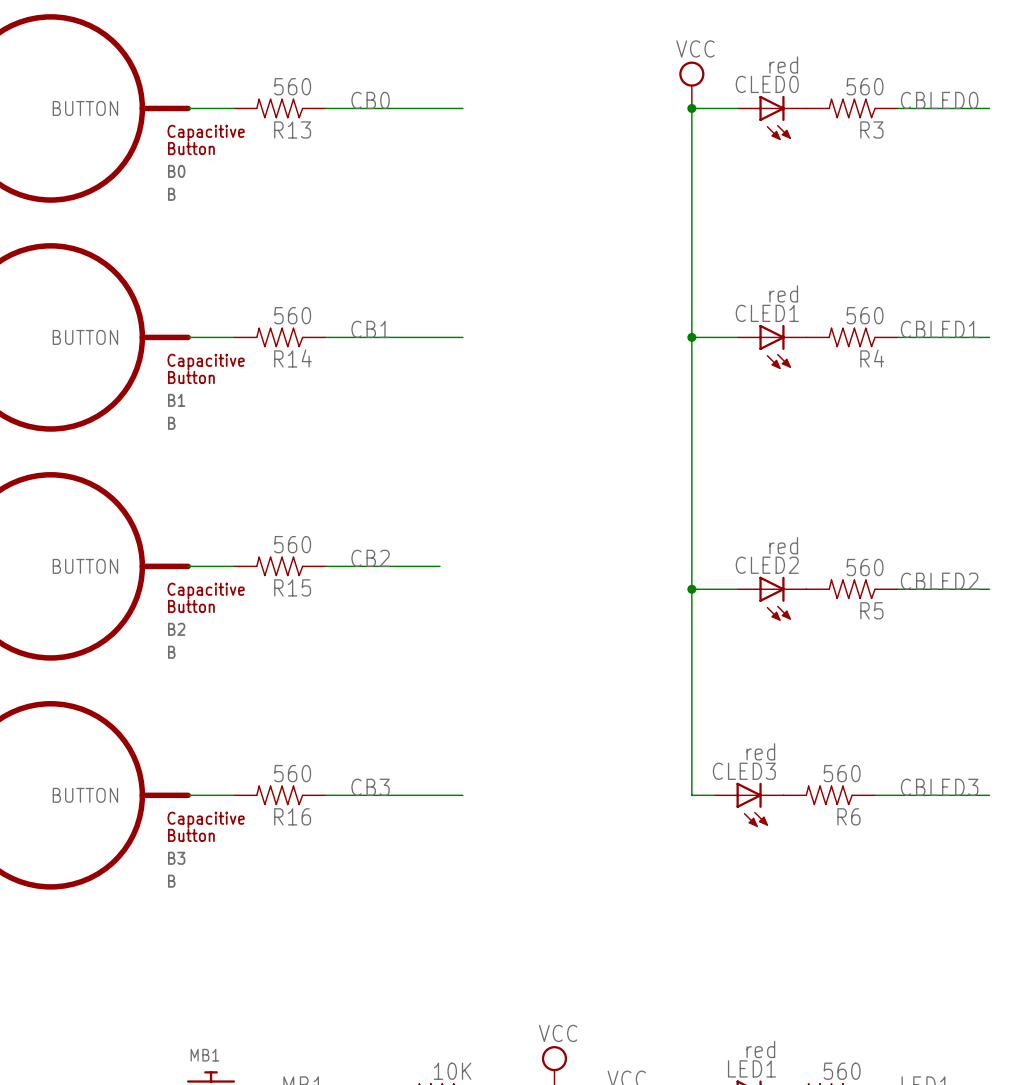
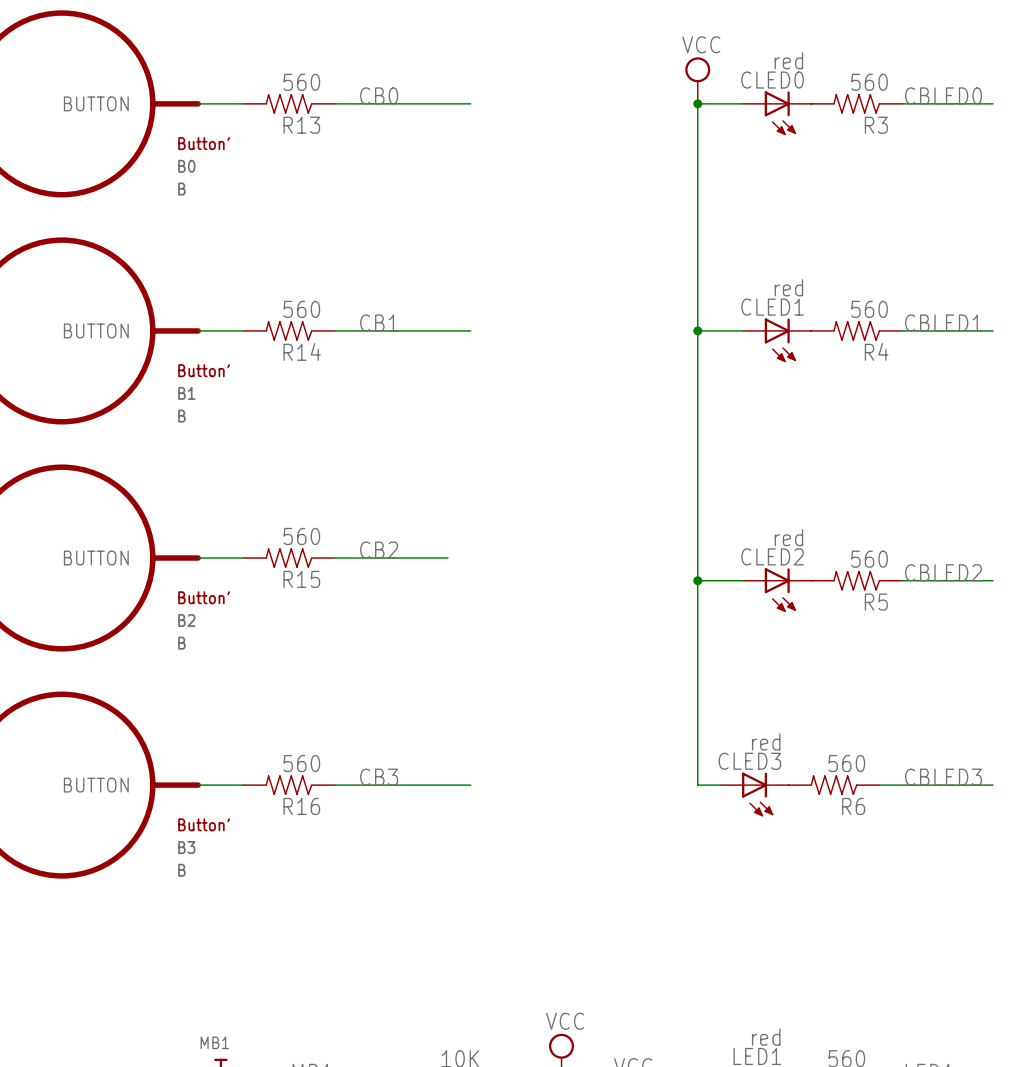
B0 text: Capacitive (206, 133) -> none
B0 text: Button (191, 148) -> Button' (204, 143)
B1 text: Capacitive (206, 362) -> none
B1 text: Button (191, 377) -> Button' (204, 370)
B2 text: Capacitive (206, 591) -> none
B2 text: Button (191, 606) -> Button' (204, 597)
B3 text: Capacitive (206, 820) -> none
B3 text: Button (191, 835) -> Button' (204, 824)

